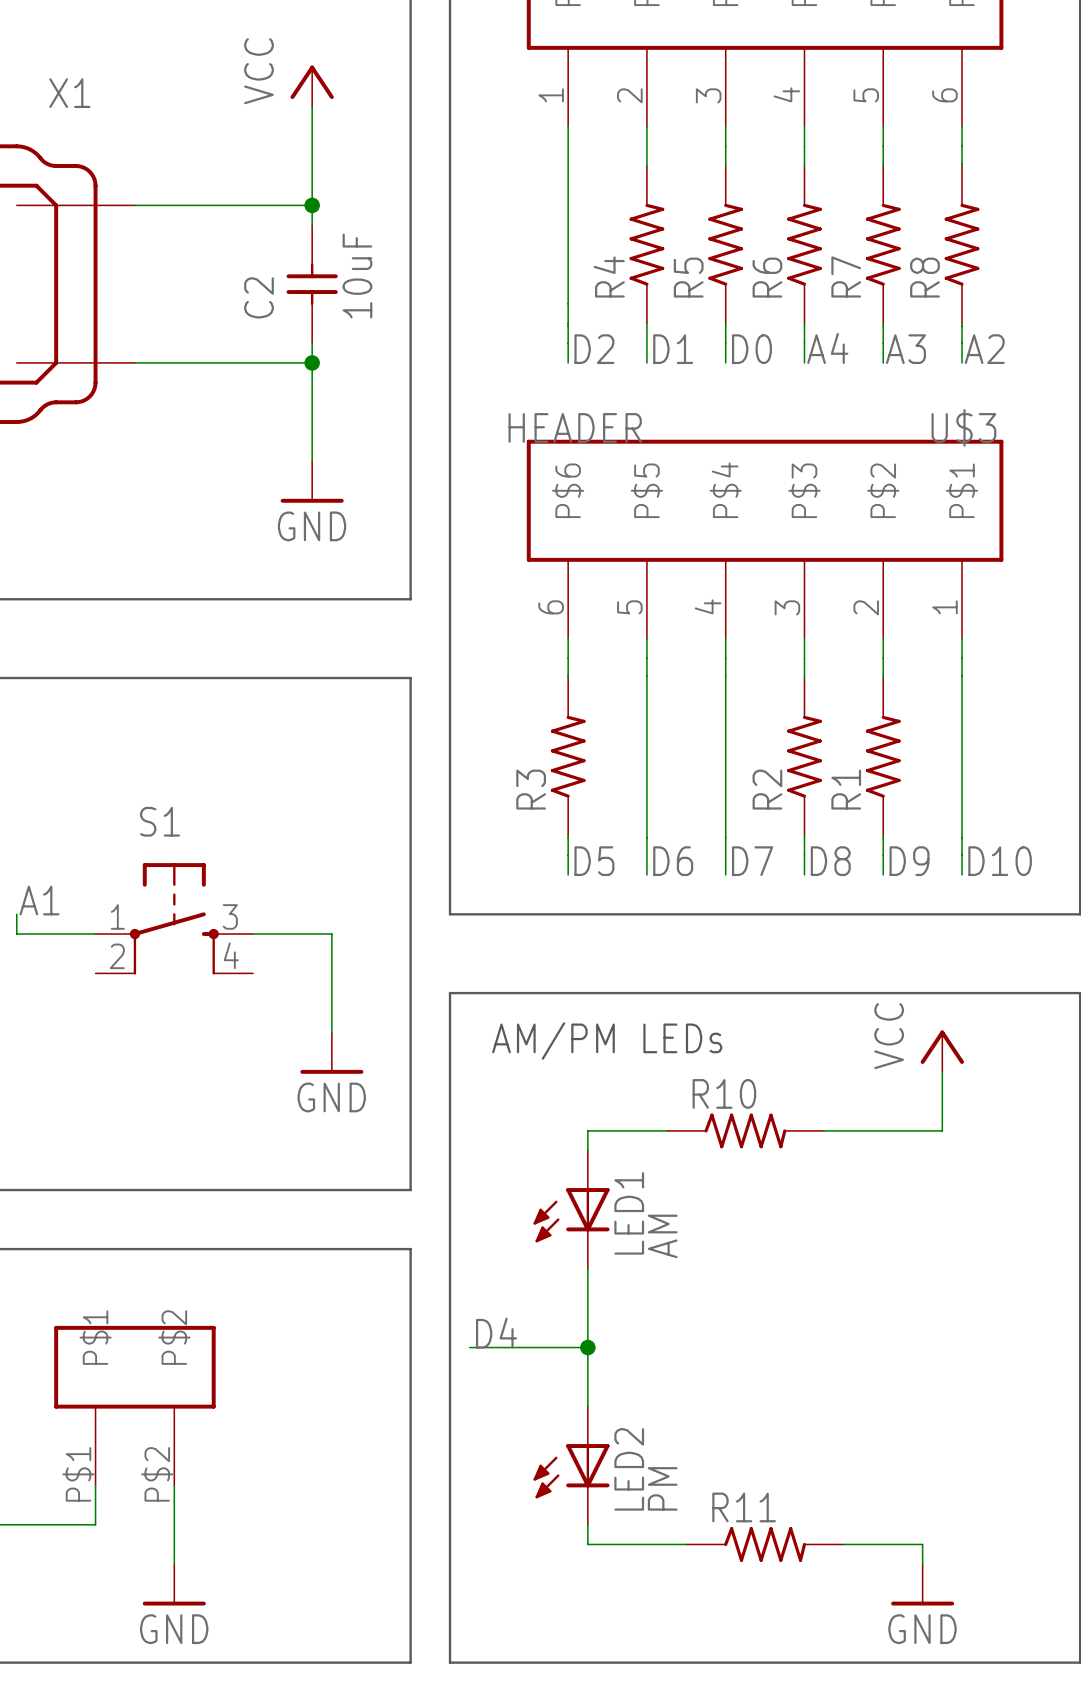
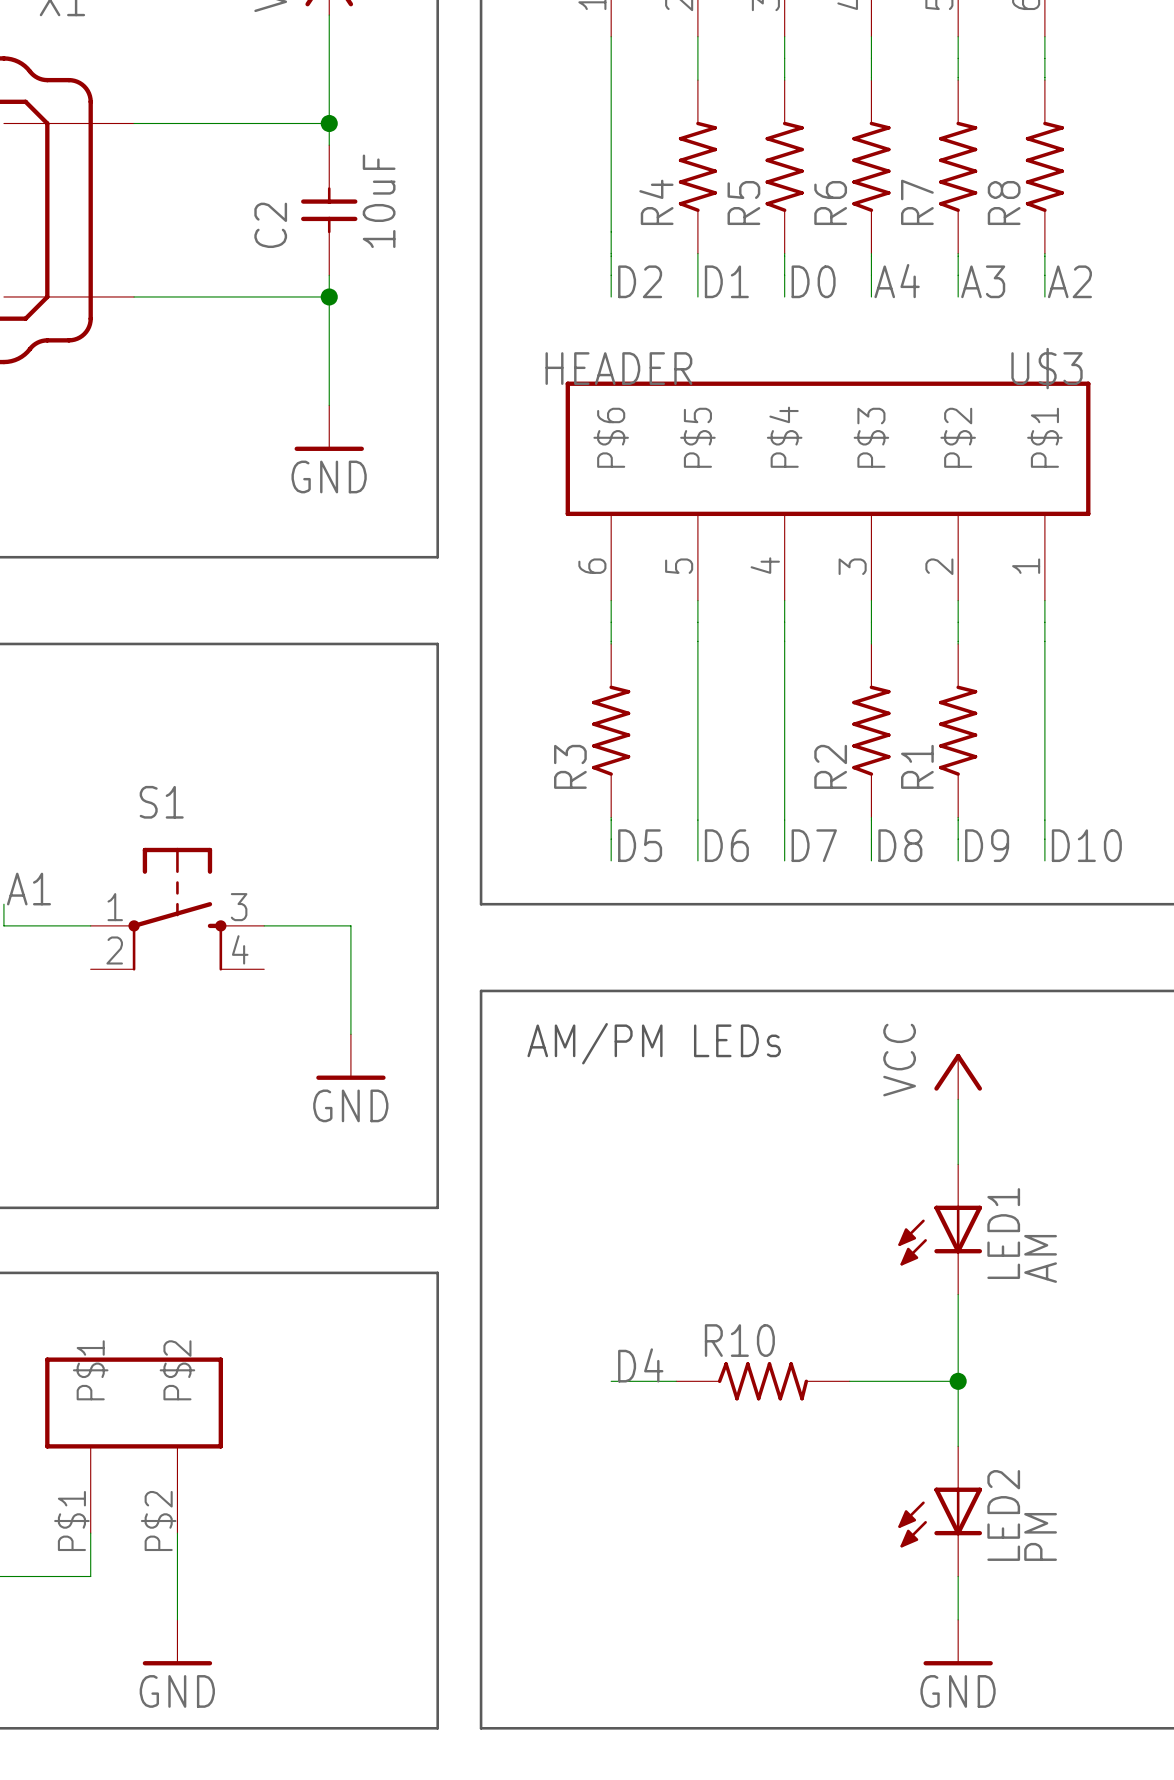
power symbol position: VCC (942, 1051) -> VCC (958, 1076)
wire: (942, 1071) (942, 1130) (824, 1130) -> none
wire: none -> (958, 1099) (958, 1164)
wire: (666, 1130) (587, 1130) (587, 1150) -> none
R10 position: (745, 1130) -> (762, 1381)
LED1 position: (571, 1209) -> (940, 1229)
wire: (587, 1268) (587, 1406) -> (958, 1294) (958, 1446)
label position: D4 (496, 1333) -> D4 (640, 1365)
wire: (469, 1347) (568, 1347) -> (849, 1381) (958, 1381)
wire: none -> (632, 1381) (676, 1381)
junction: (587, 1347) -> none
junction: none -> (958, 1381)
LED2 position: (571, 1465) -> (940, 1511)
wire: (587, 1524) (587, 1544) (686, 1544) -> none
wire: none -> (958, 1576) (958, 1619)
R11: (765, 1544) -> none
wire: (843, 1544) (922, 1544) (922, 1564) -> none
power symbol position: GND (922, 1584) -> GND (958, 1642)

